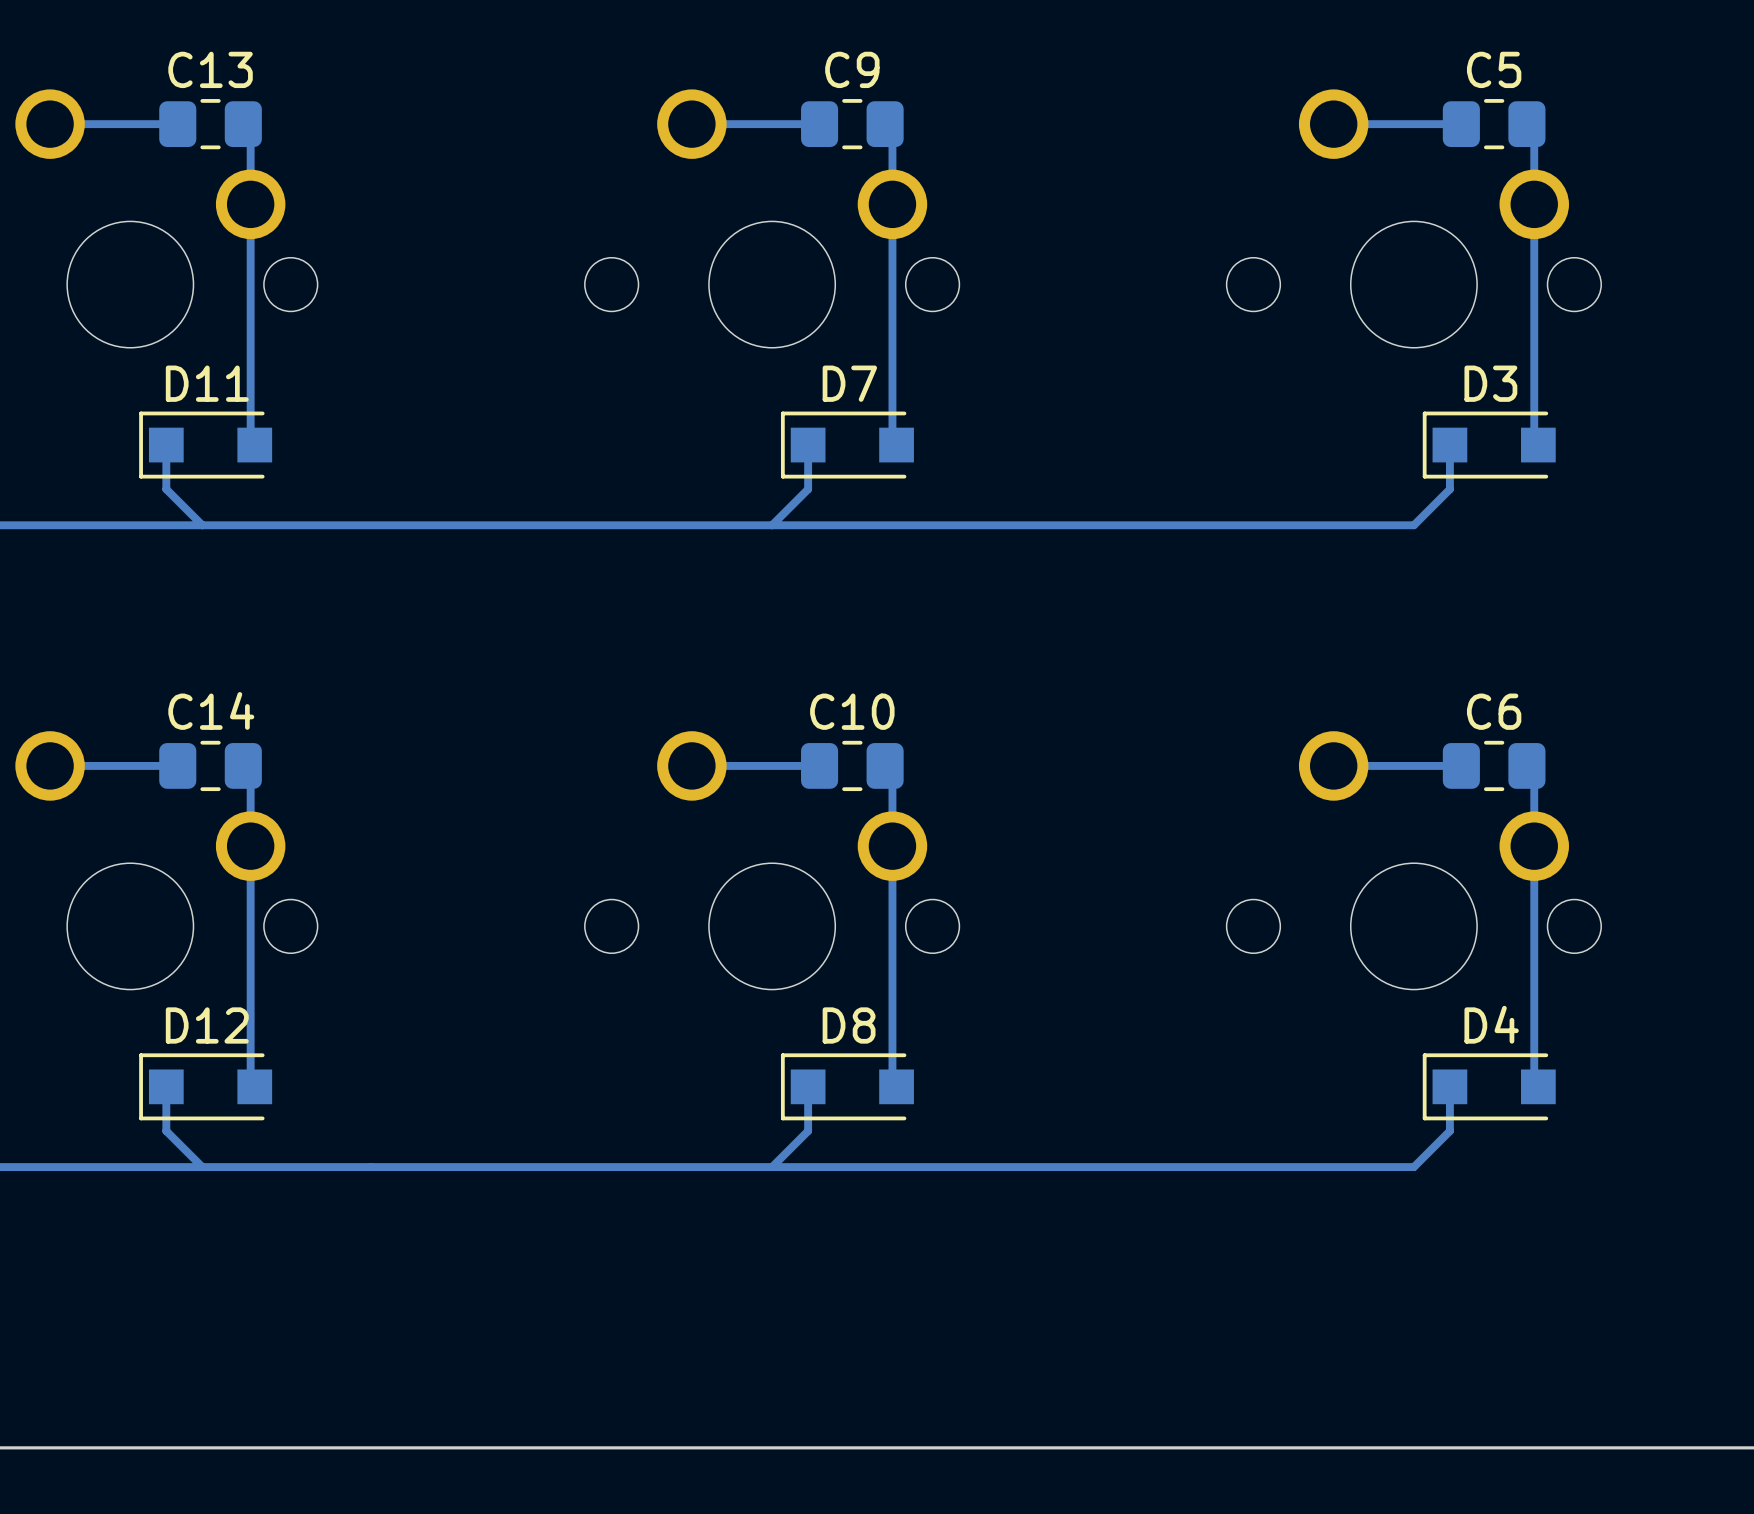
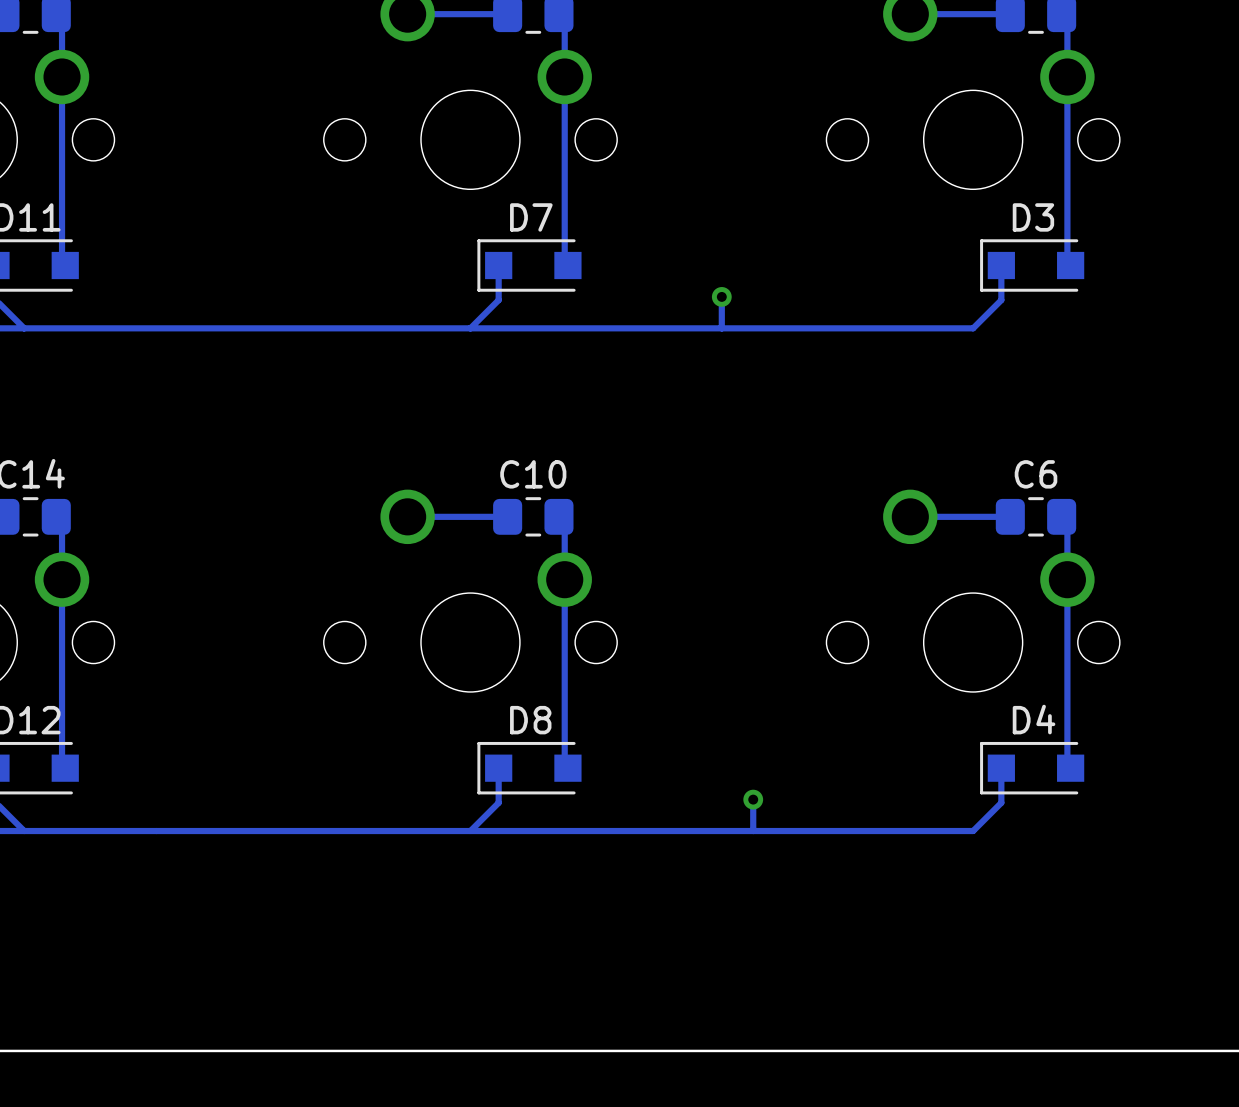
track: none -> (721, 296) (721, 328)
via: none -> (721, 296)
track: none -> (753, 799) (753, 831)
via: none -> (753, 799)

